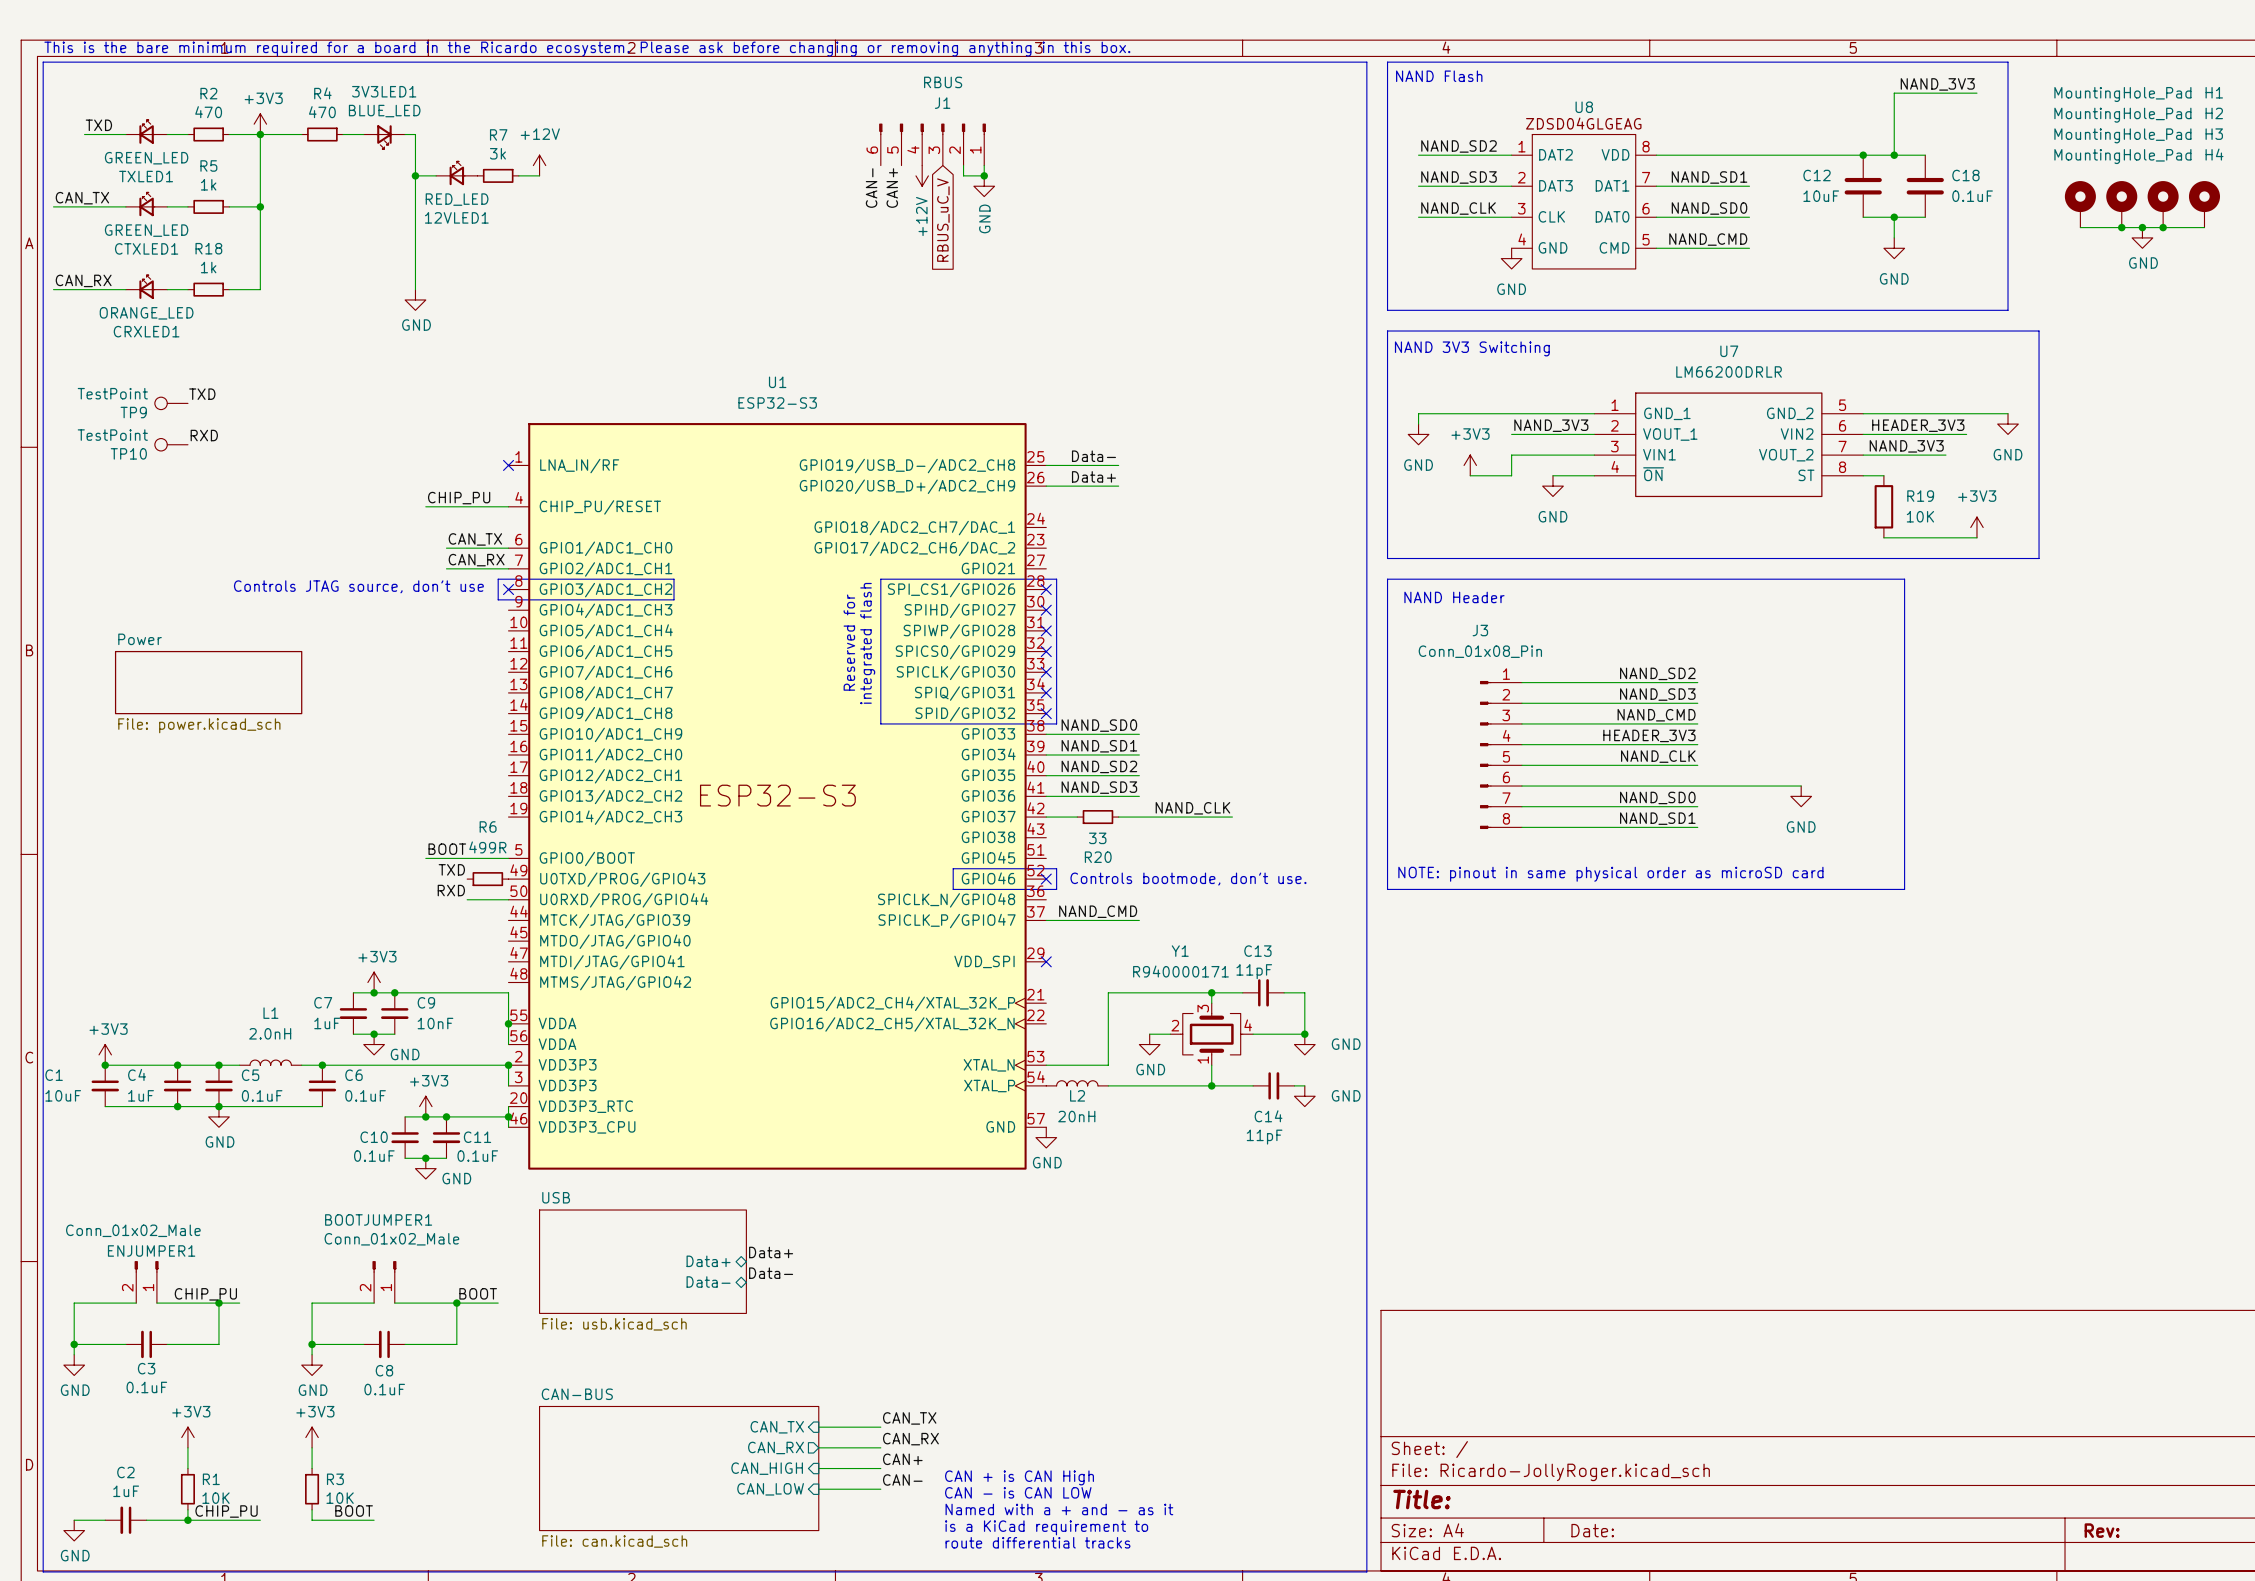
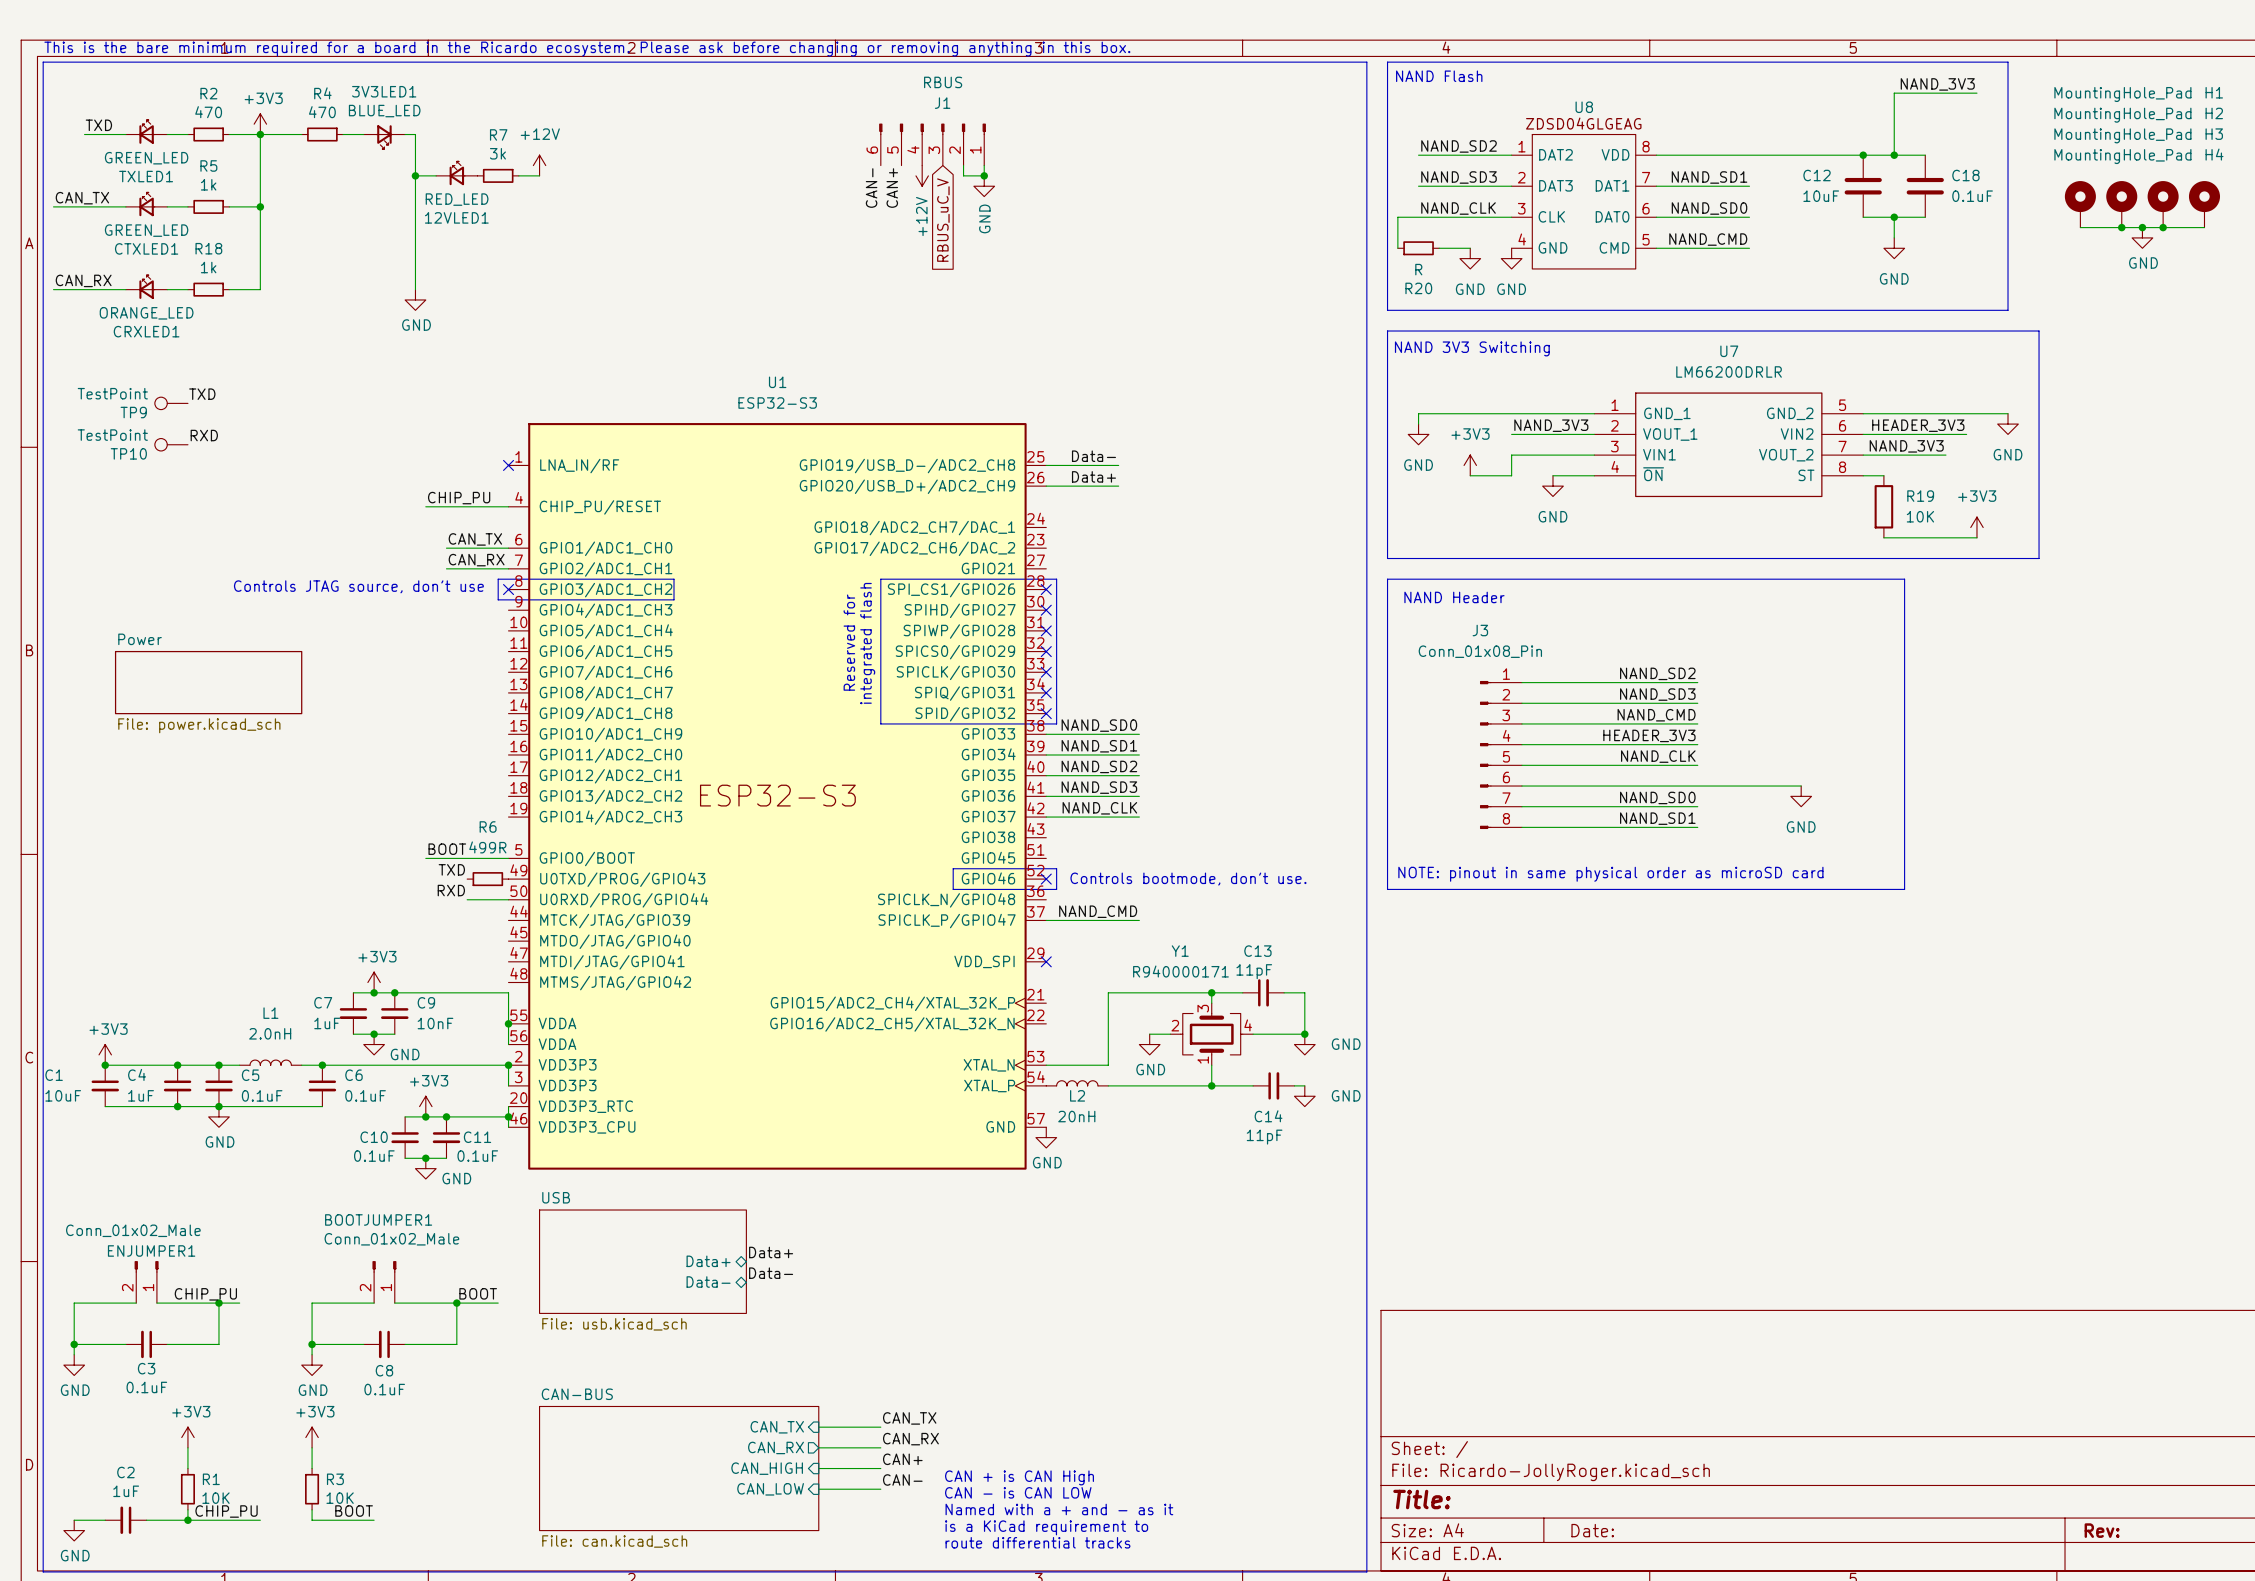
wire: none -> (1418, 217) (1397, 217) (1397, 248)
wire: none -> (1439, 248) (1470, 248)
power symbol: none -> GND (1470, 258)
label position: NAND_CLK (1192, 808) -> NAND_CLK (1099, 808)
wire: none -> (1077, 817) (1118, 817)
R20 position: (1097, 817) -> (1418, 248)
wire: (1139, 817) (1232, 817) -> none
R20 value: 33 (1097, 838) -> R (1418, 269)

